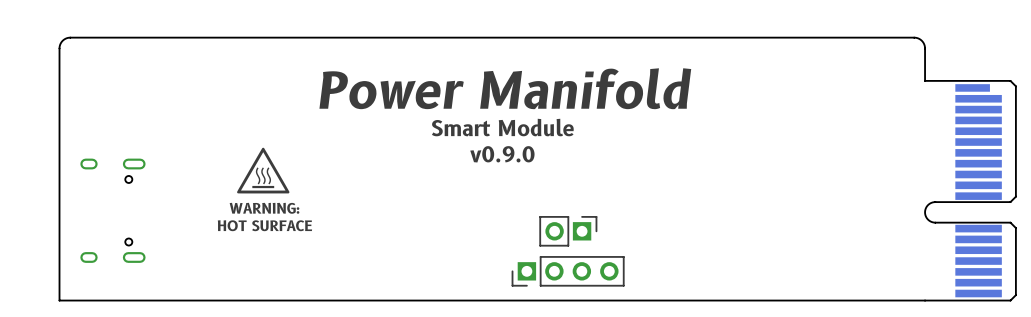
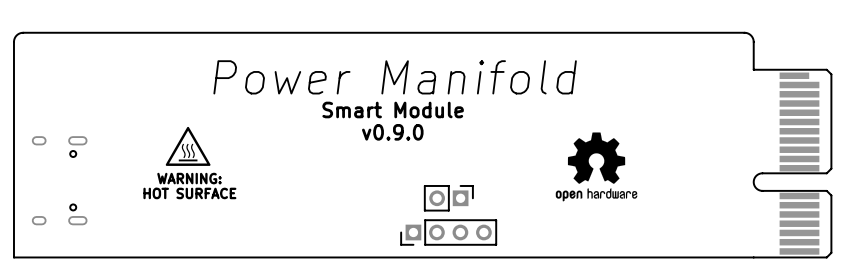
drawing: none -> [555, 132, 638, 202]

